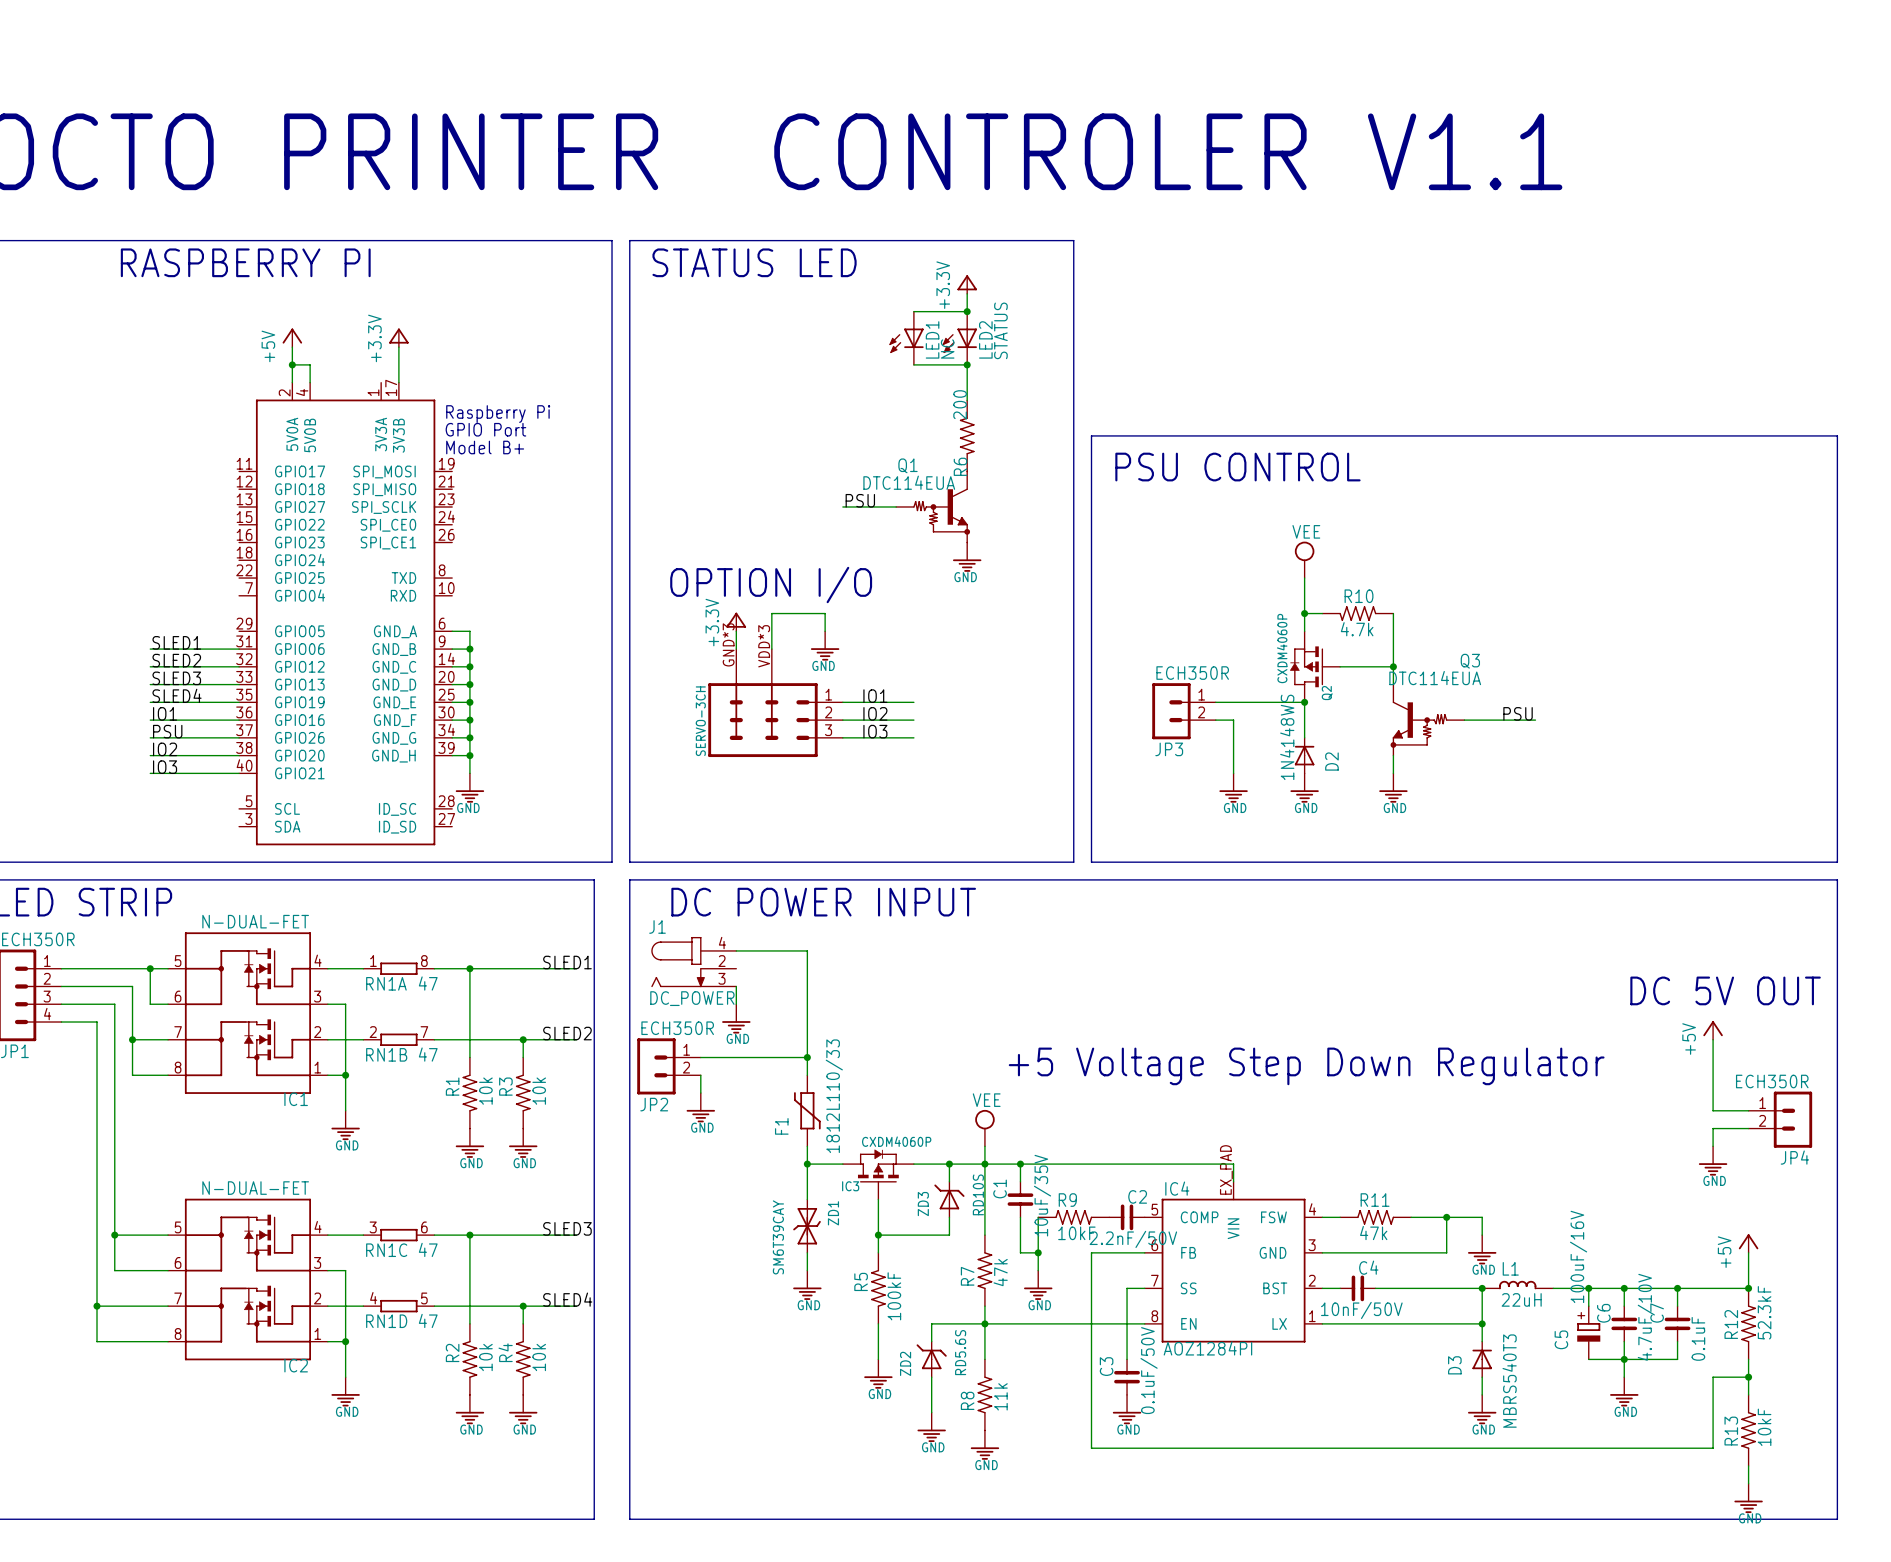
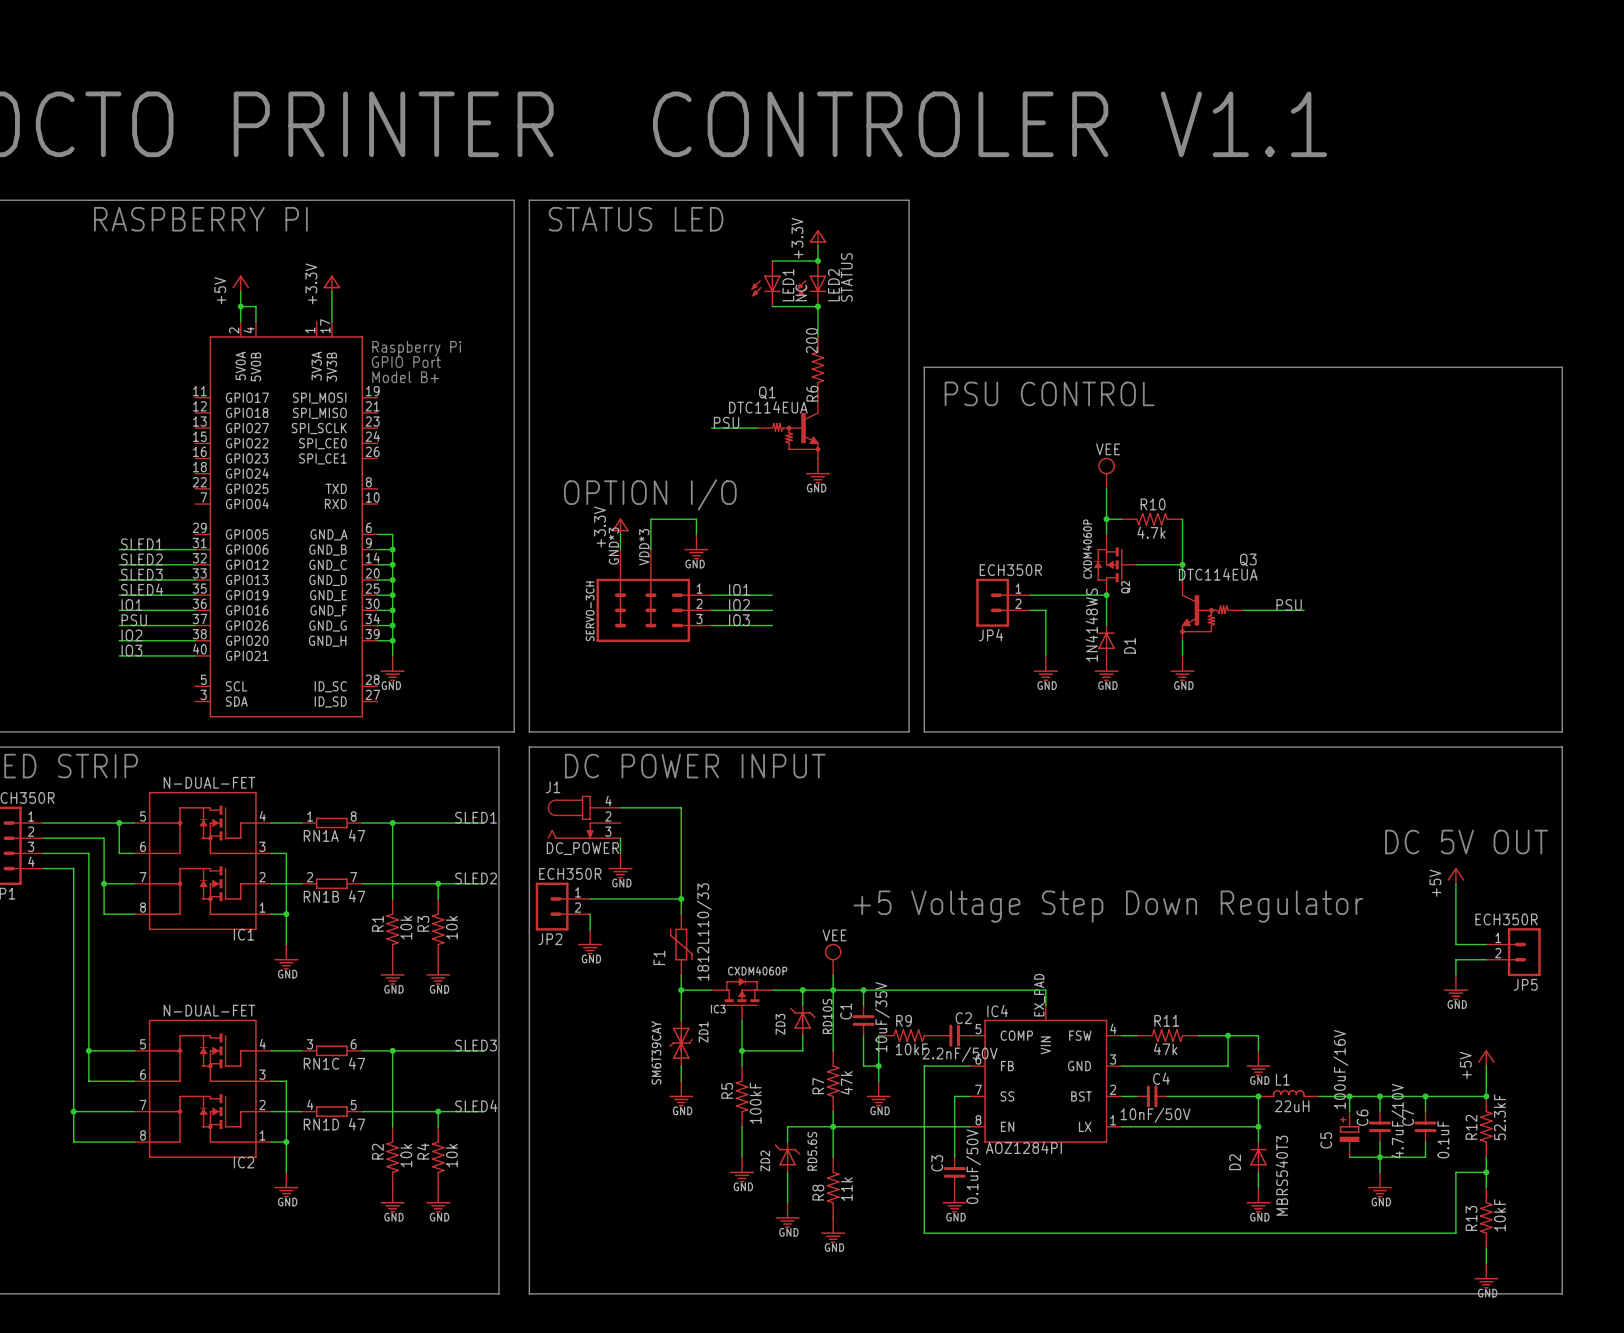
JP3 name: JP3 (1169, 749) -> JP4 (991, 635)
D2 name: D2 (1331, 761) -> D1 (1129, 645)
JP4 name: JP4 (1794, 1157) -> JP5 (1525, 984)
D3 name: D3 (1454, 1365) -> D2 (1235, 1162)

